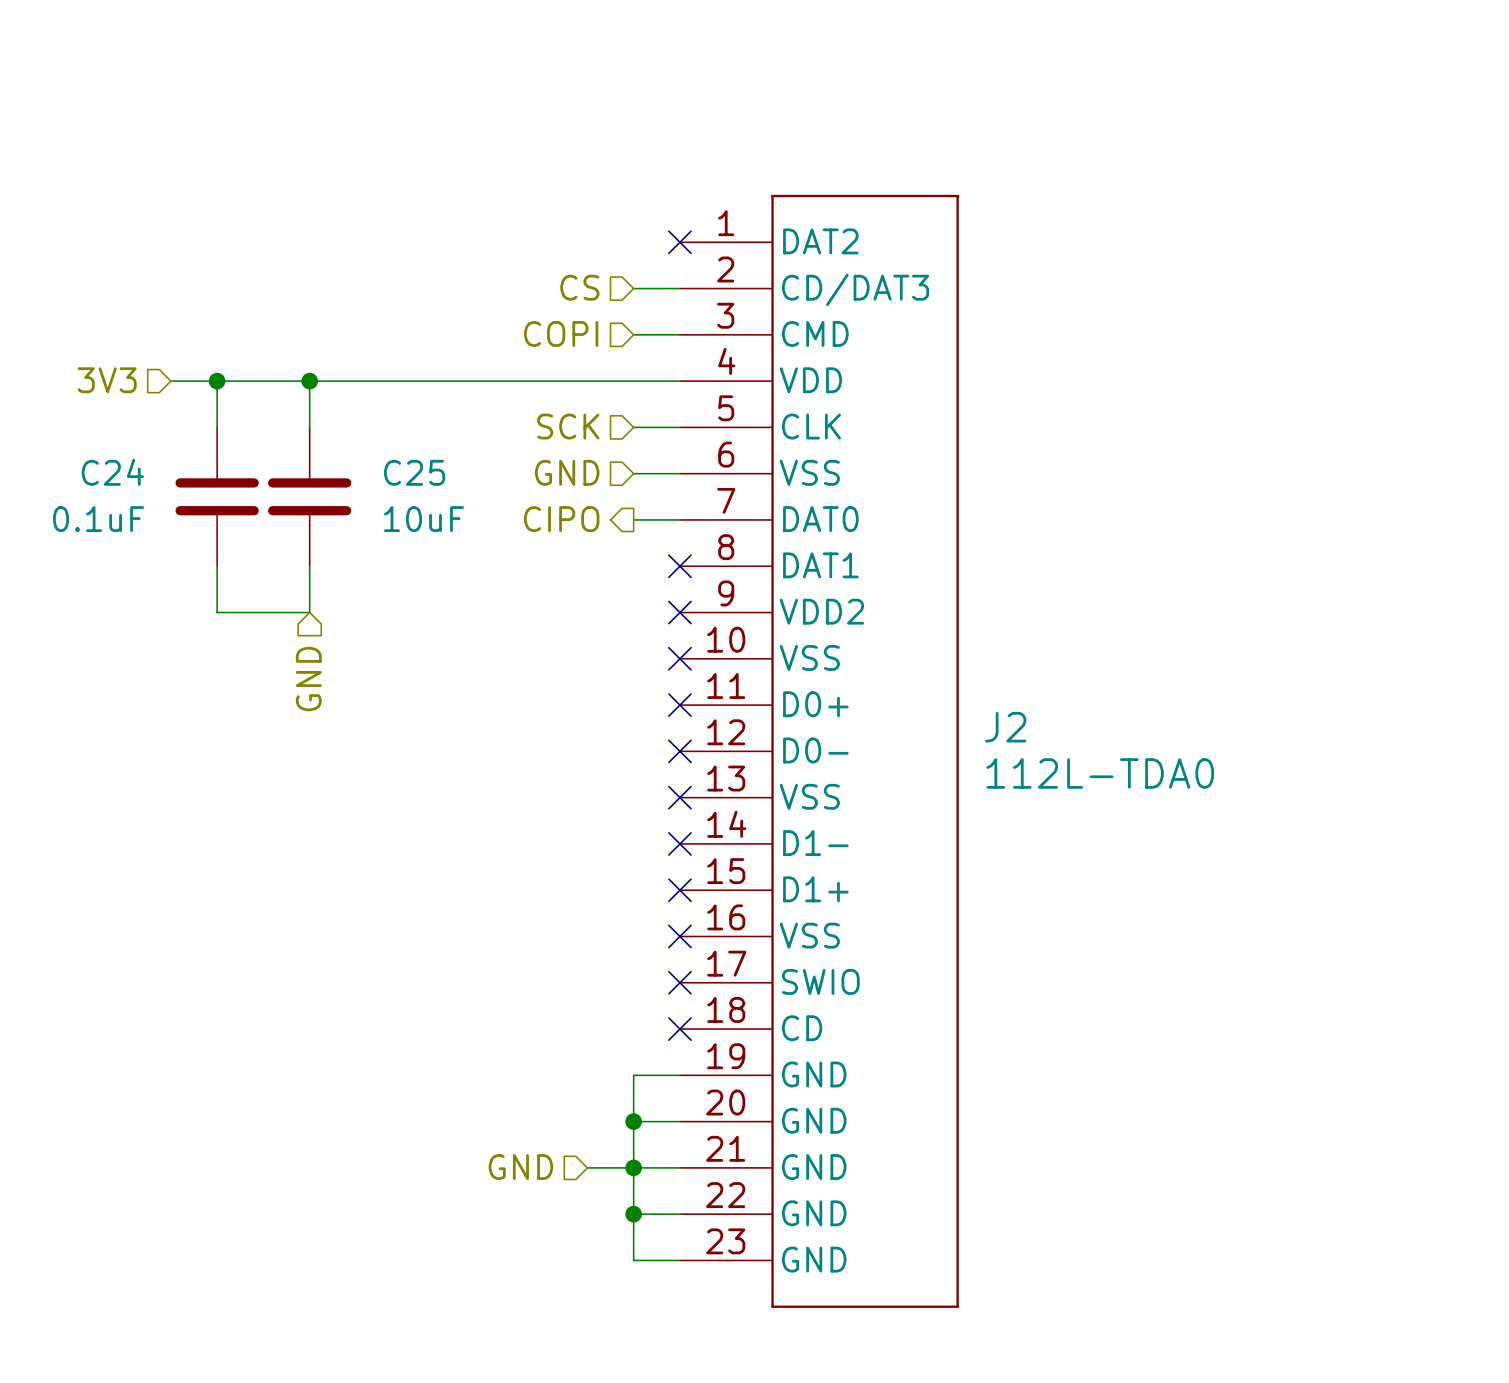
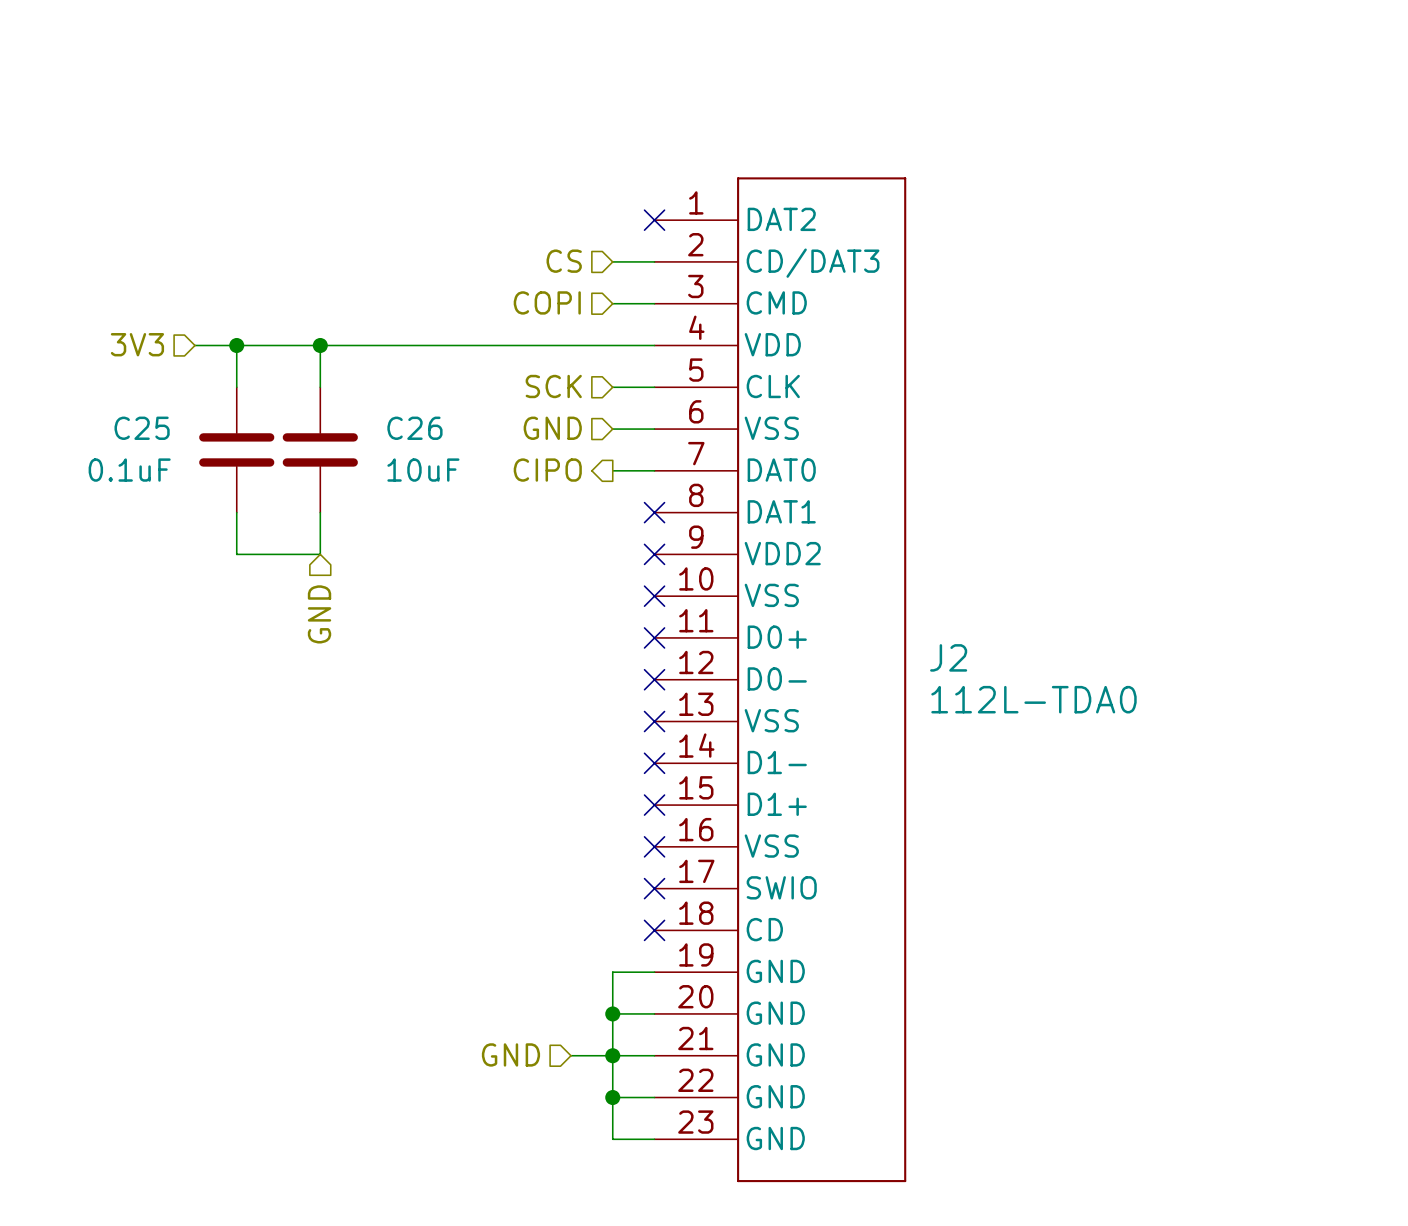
C24 name: C24 (112, 472) -> C25 (142, 428)
C25 name: C25 (414, 472) -> C26 (414, 428)

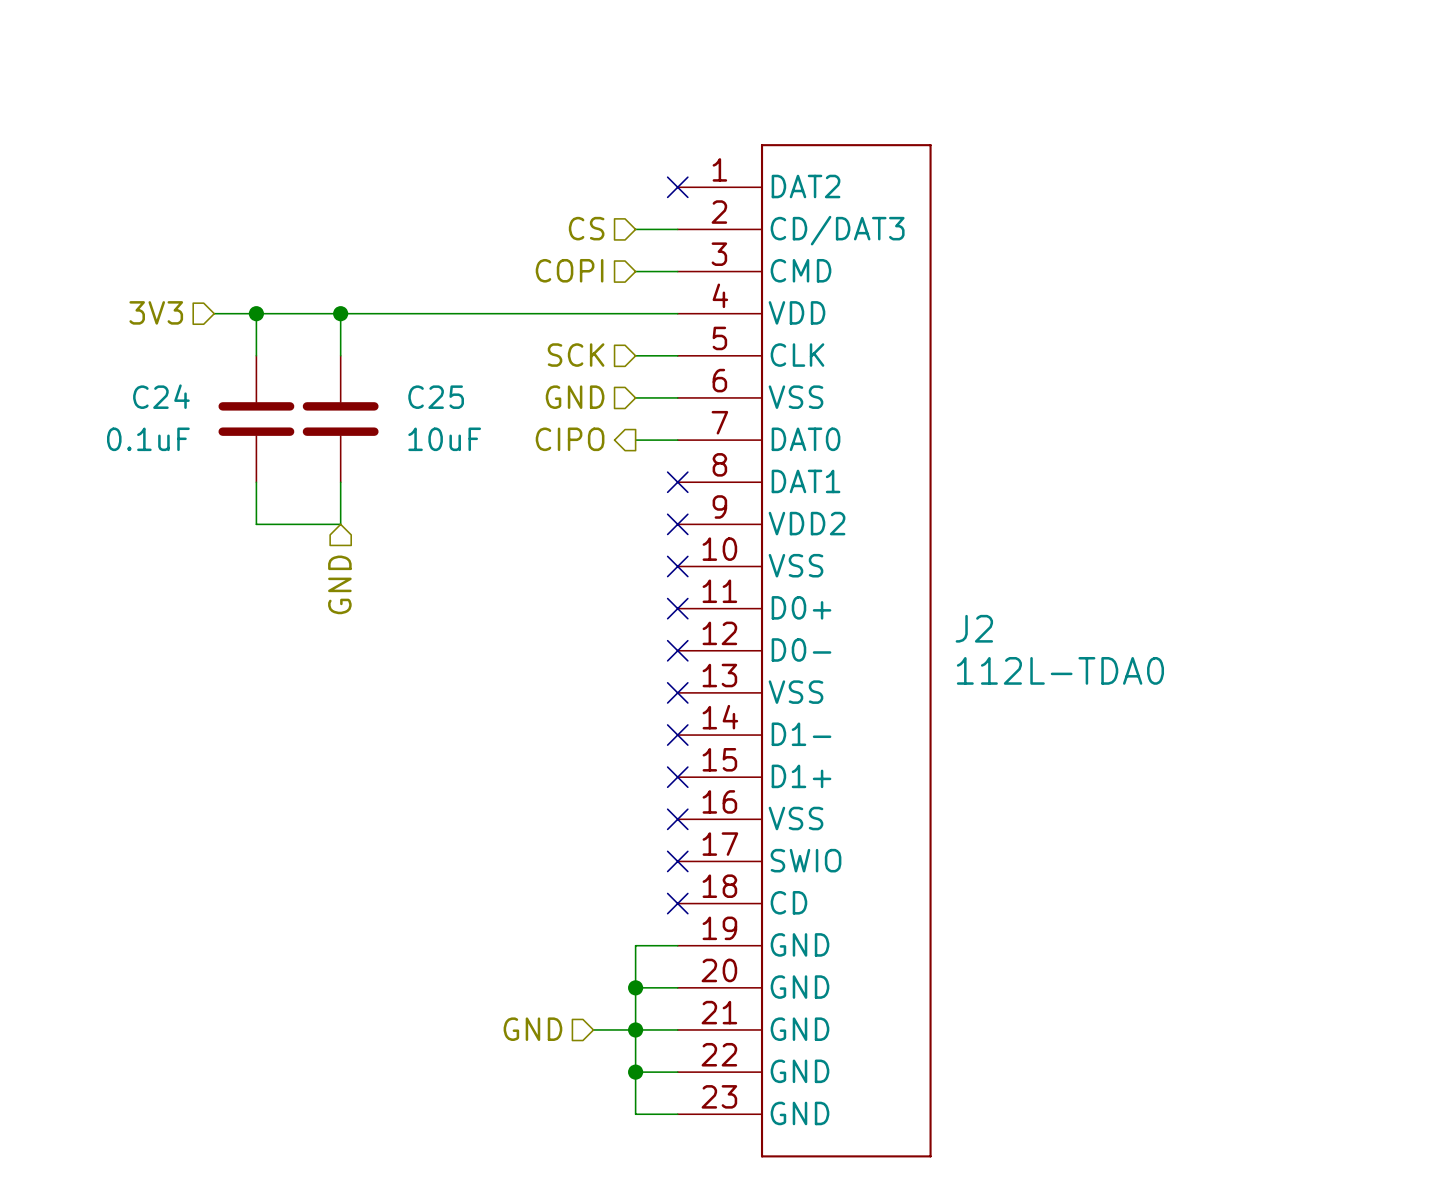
C25 name: C25 (142, 428) -> C24 (161, 396)
C26 name: C26 (414, 428) -> C25 (436, 397)

